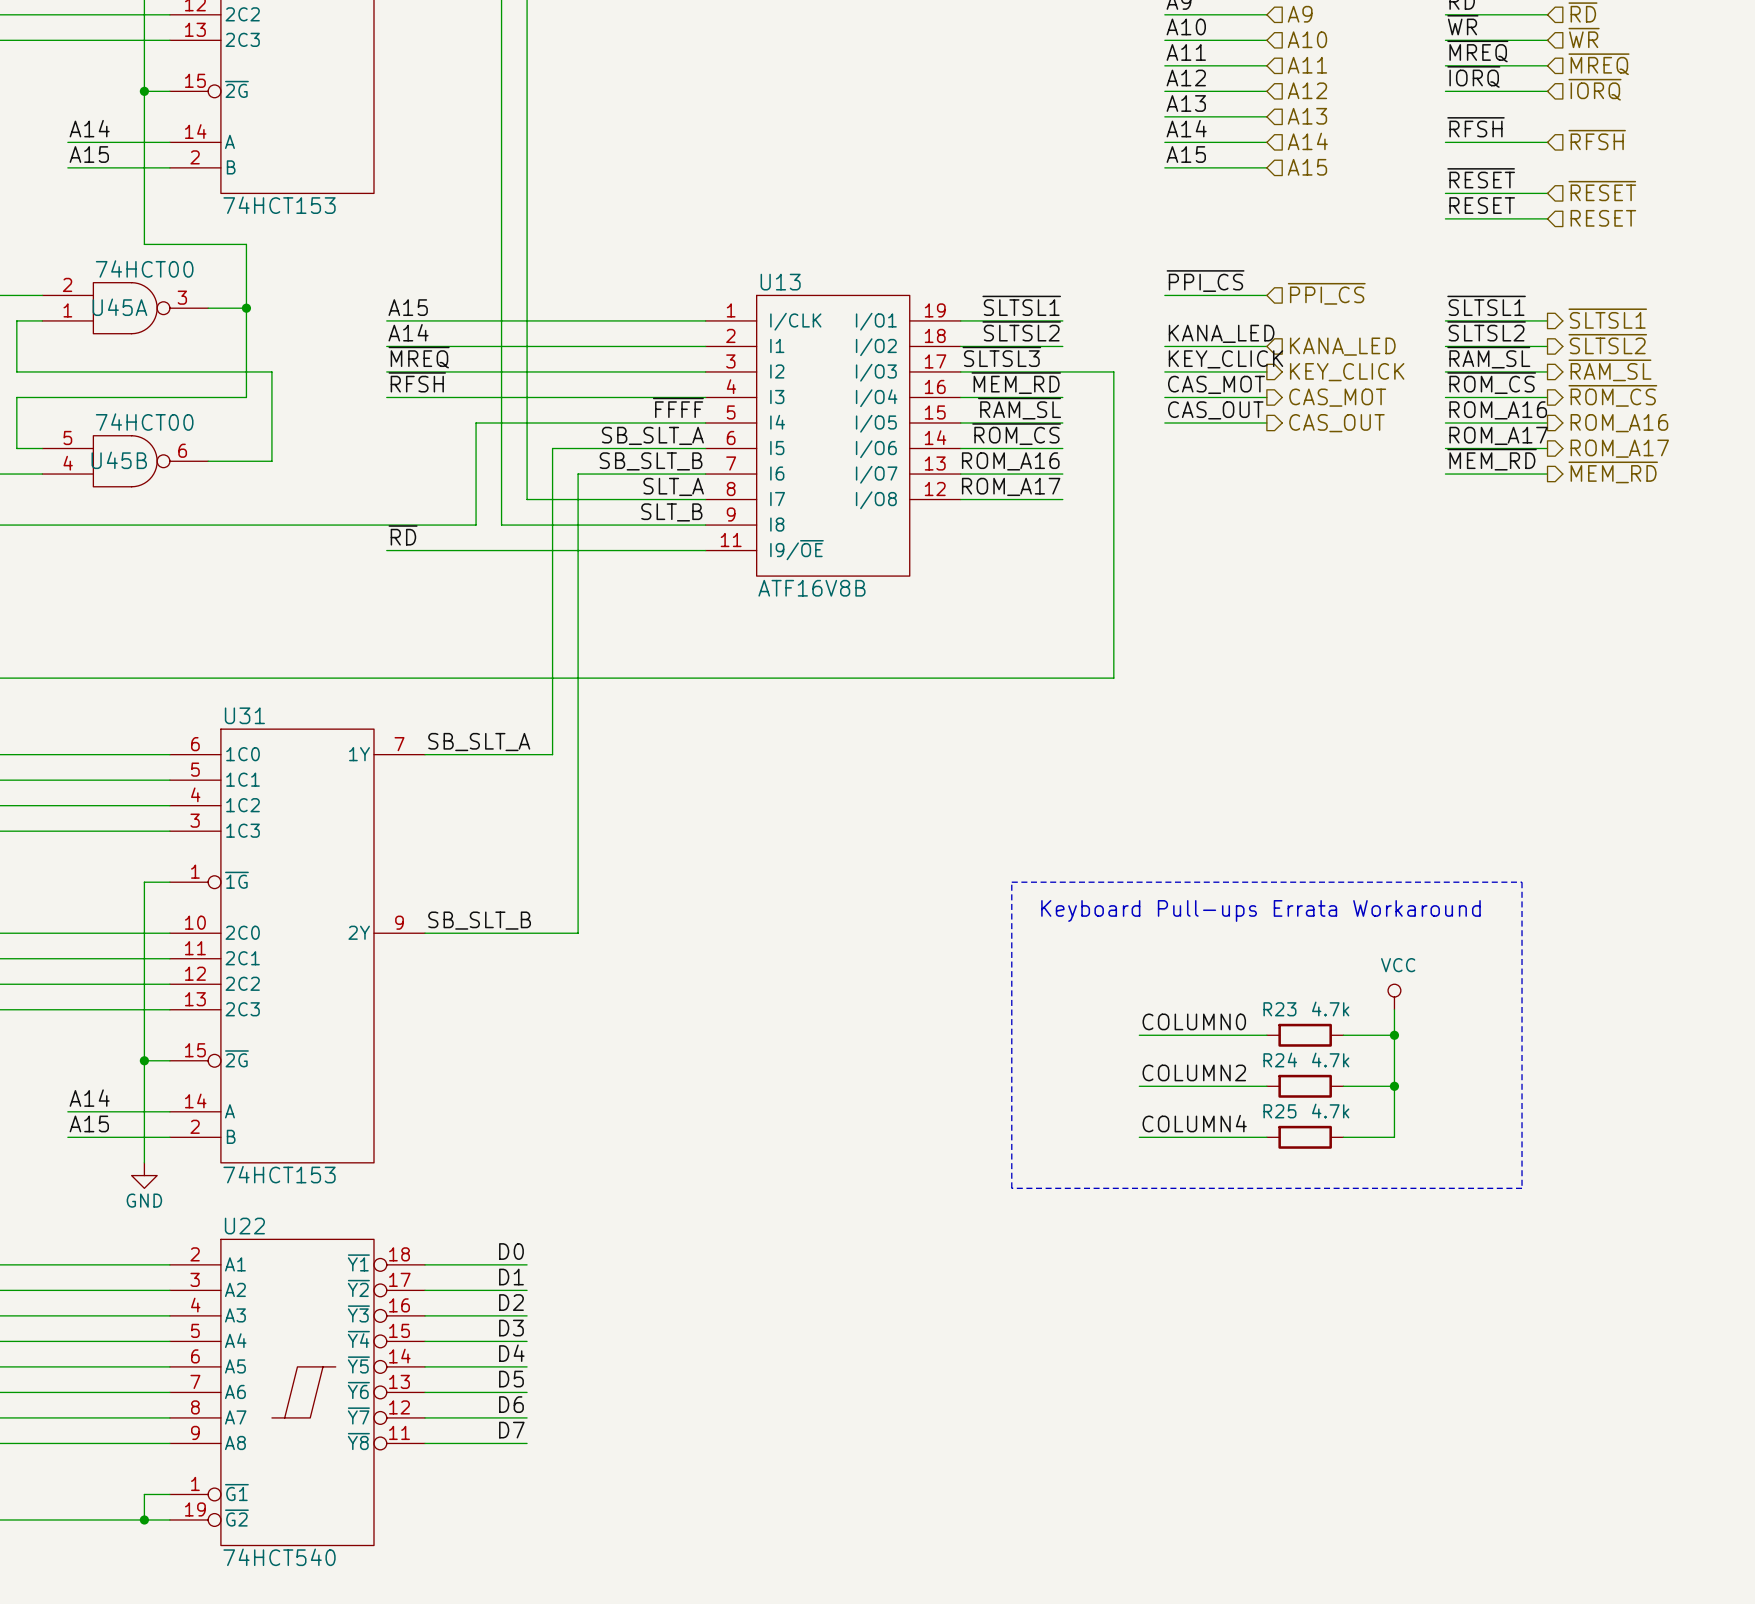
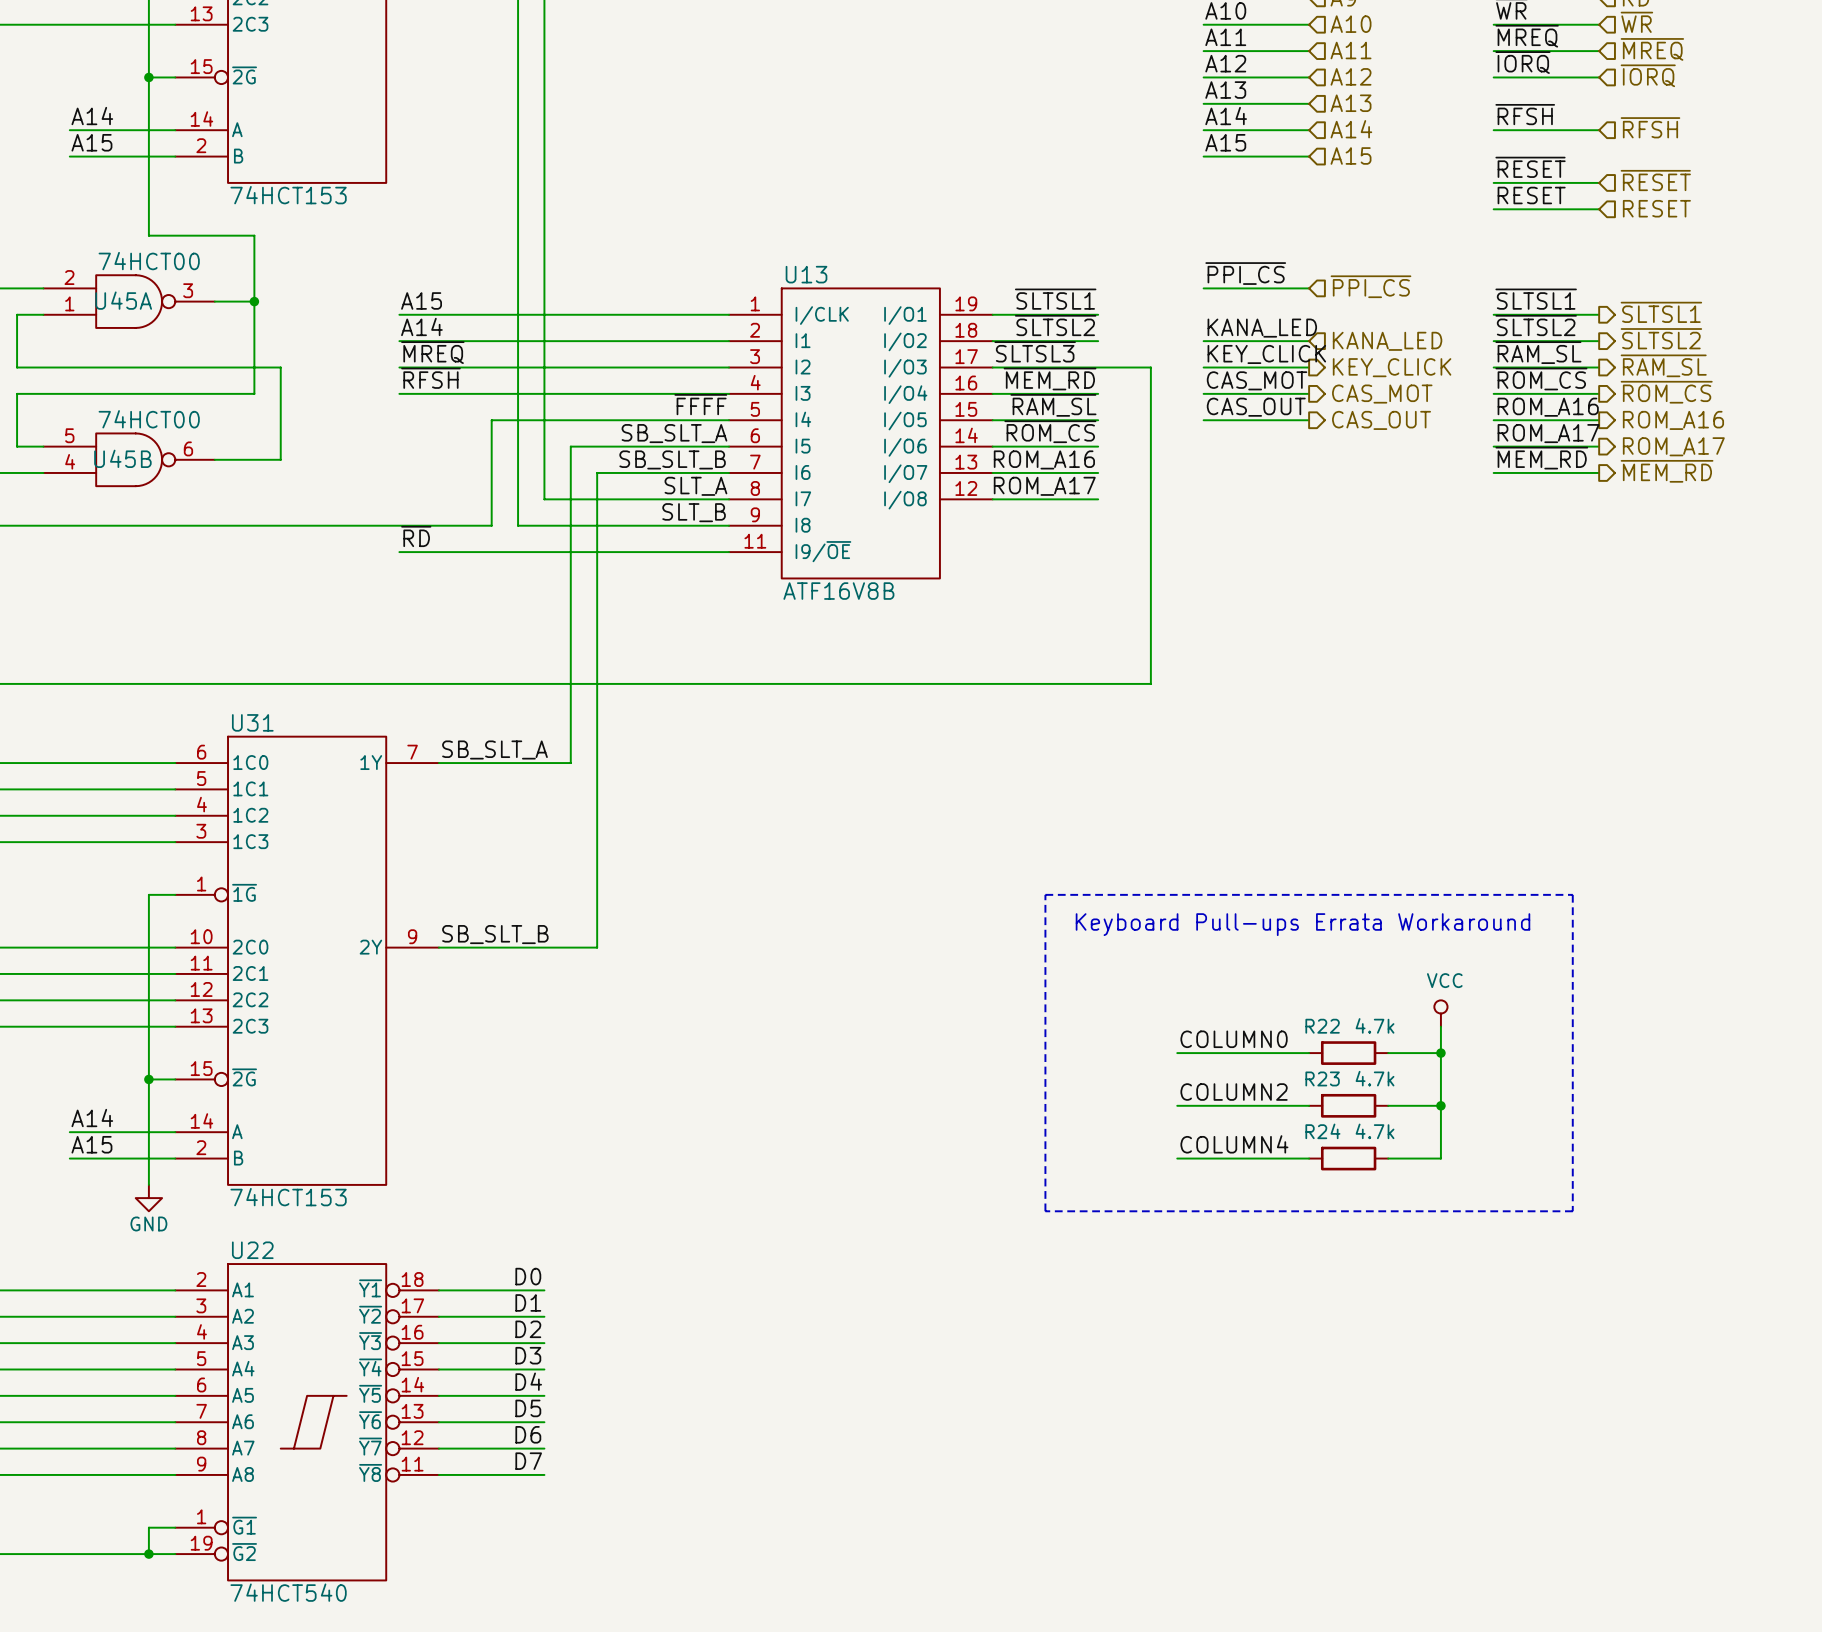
R23 name: R23 (1279, 1009) -> R22 (1322, 1026)
R24 name: R24 (1280, 1060) -> R23 (1322, 1078)
R25 name: R25 (1279, 1111) -> R24 (1322, 1131)

